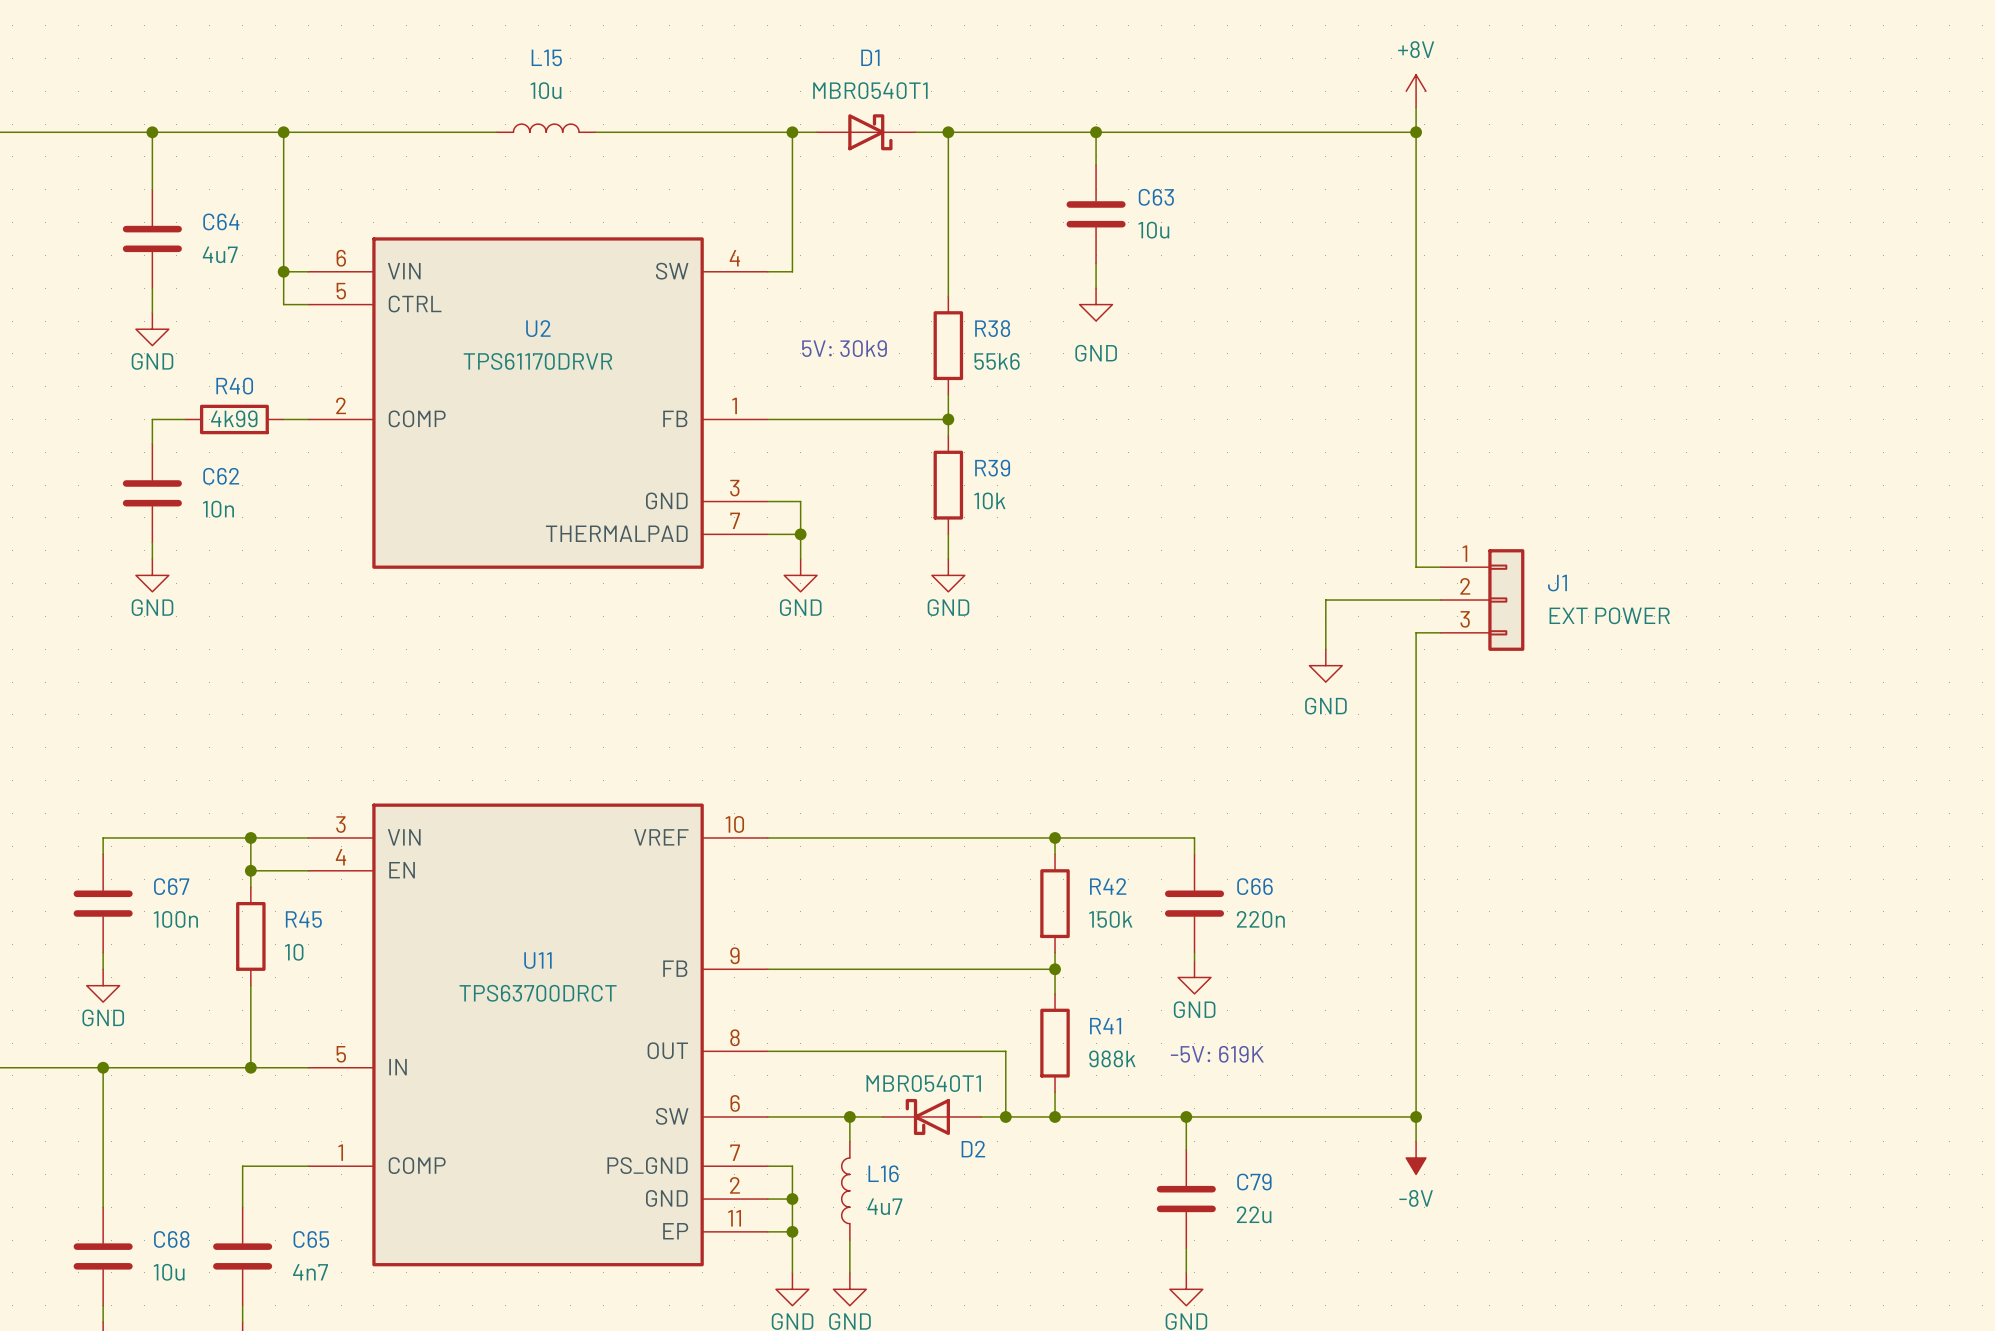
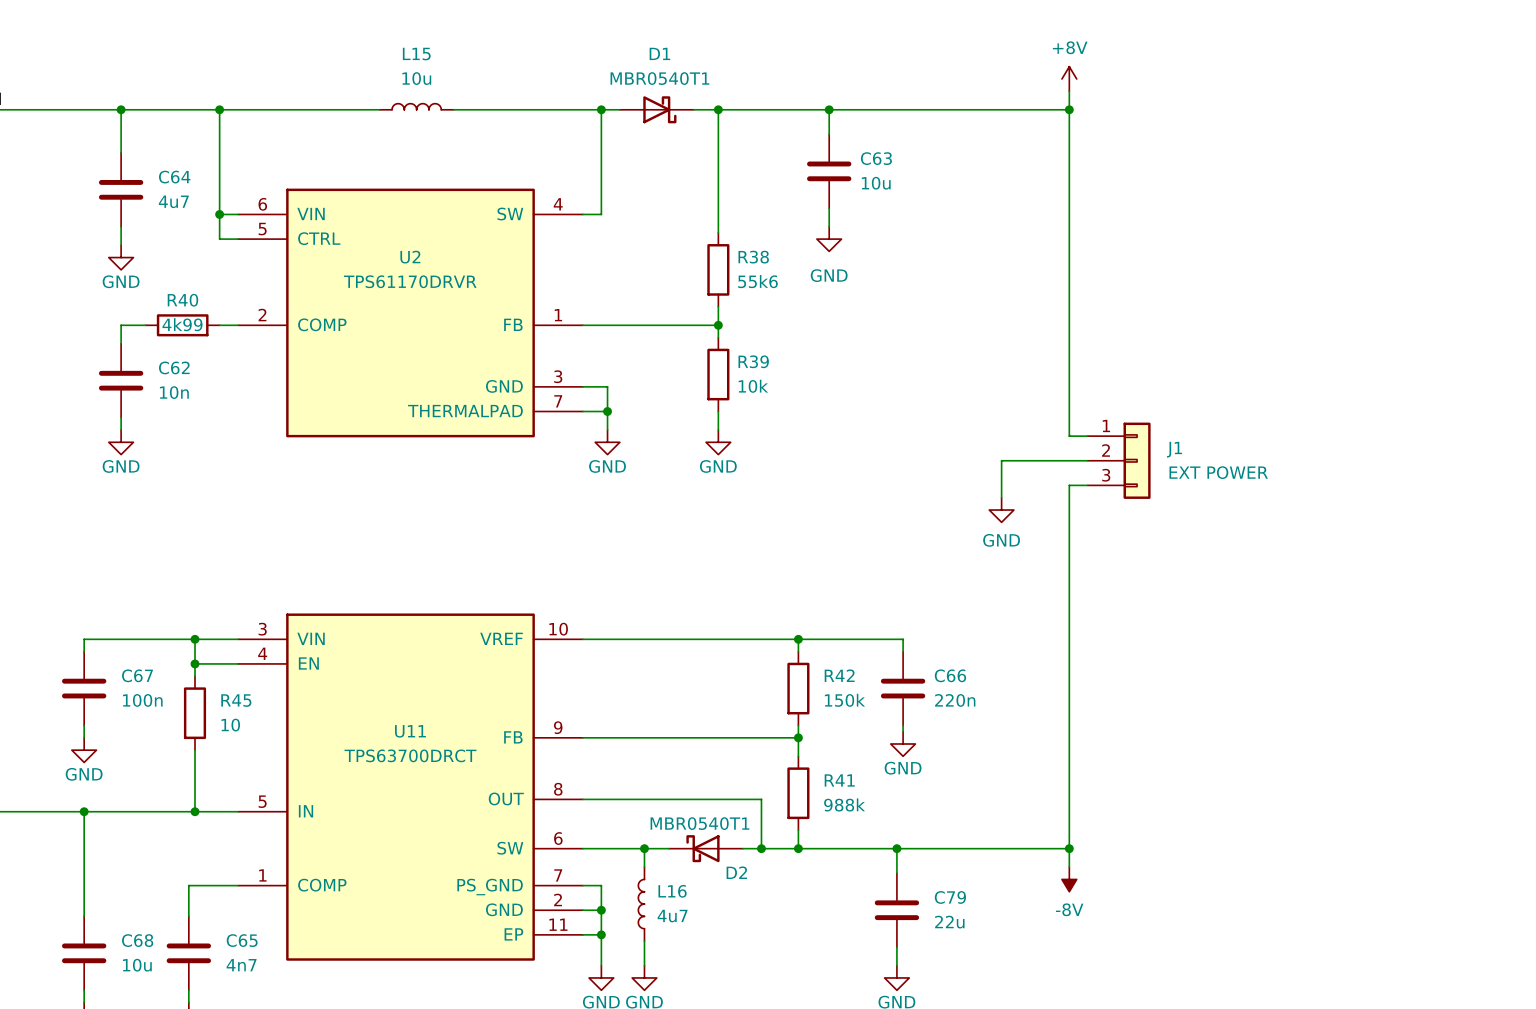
text: 5V: 30k9 (844, 348) -> none
text: -5V: 619K (1217, 1054) -> none

